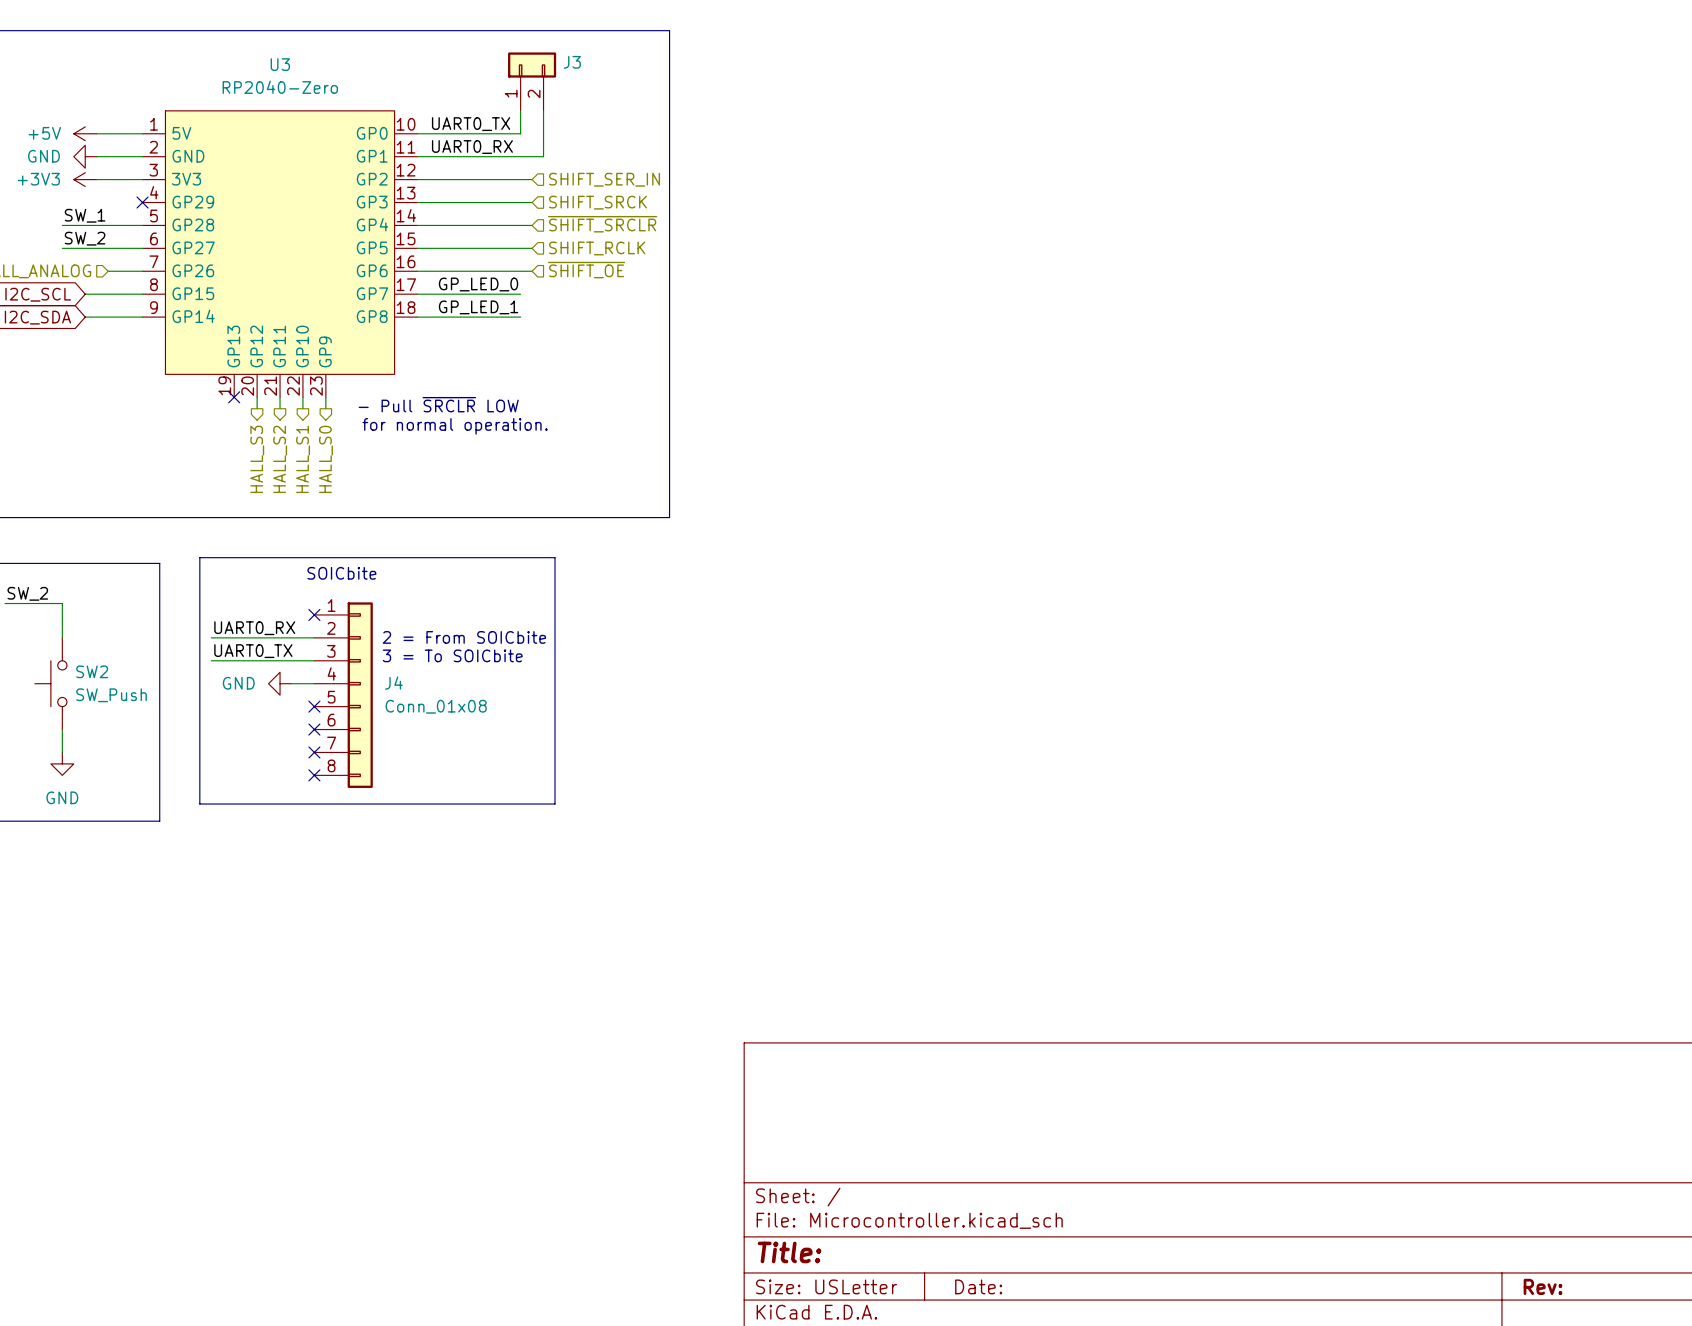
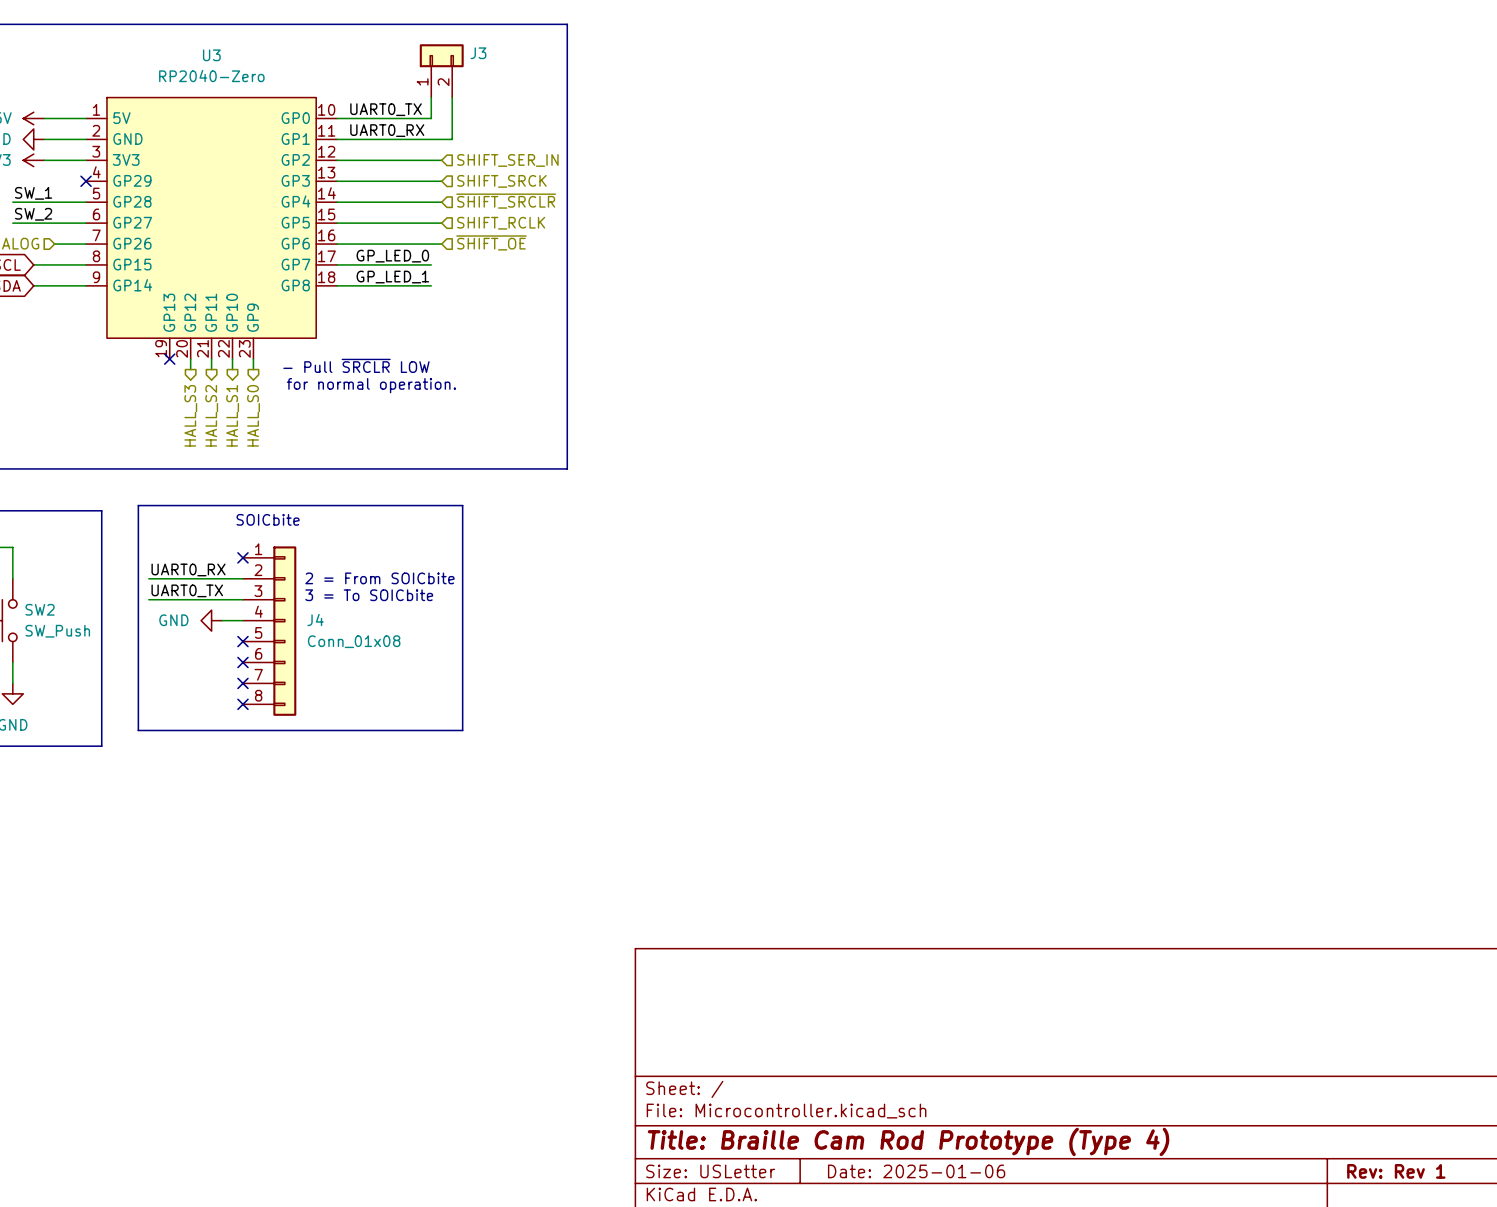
title block: Title: (789, 1252) -> Title: Braille Cam Rod Prototype (Type 4) (908, 1141)
title block: Date: (978, 1286) -> Date: 2025-01-06 (916, 1171)
title block: Rev: (1543, 1286) -> Rev: Rev 1 (1396, 1171)

